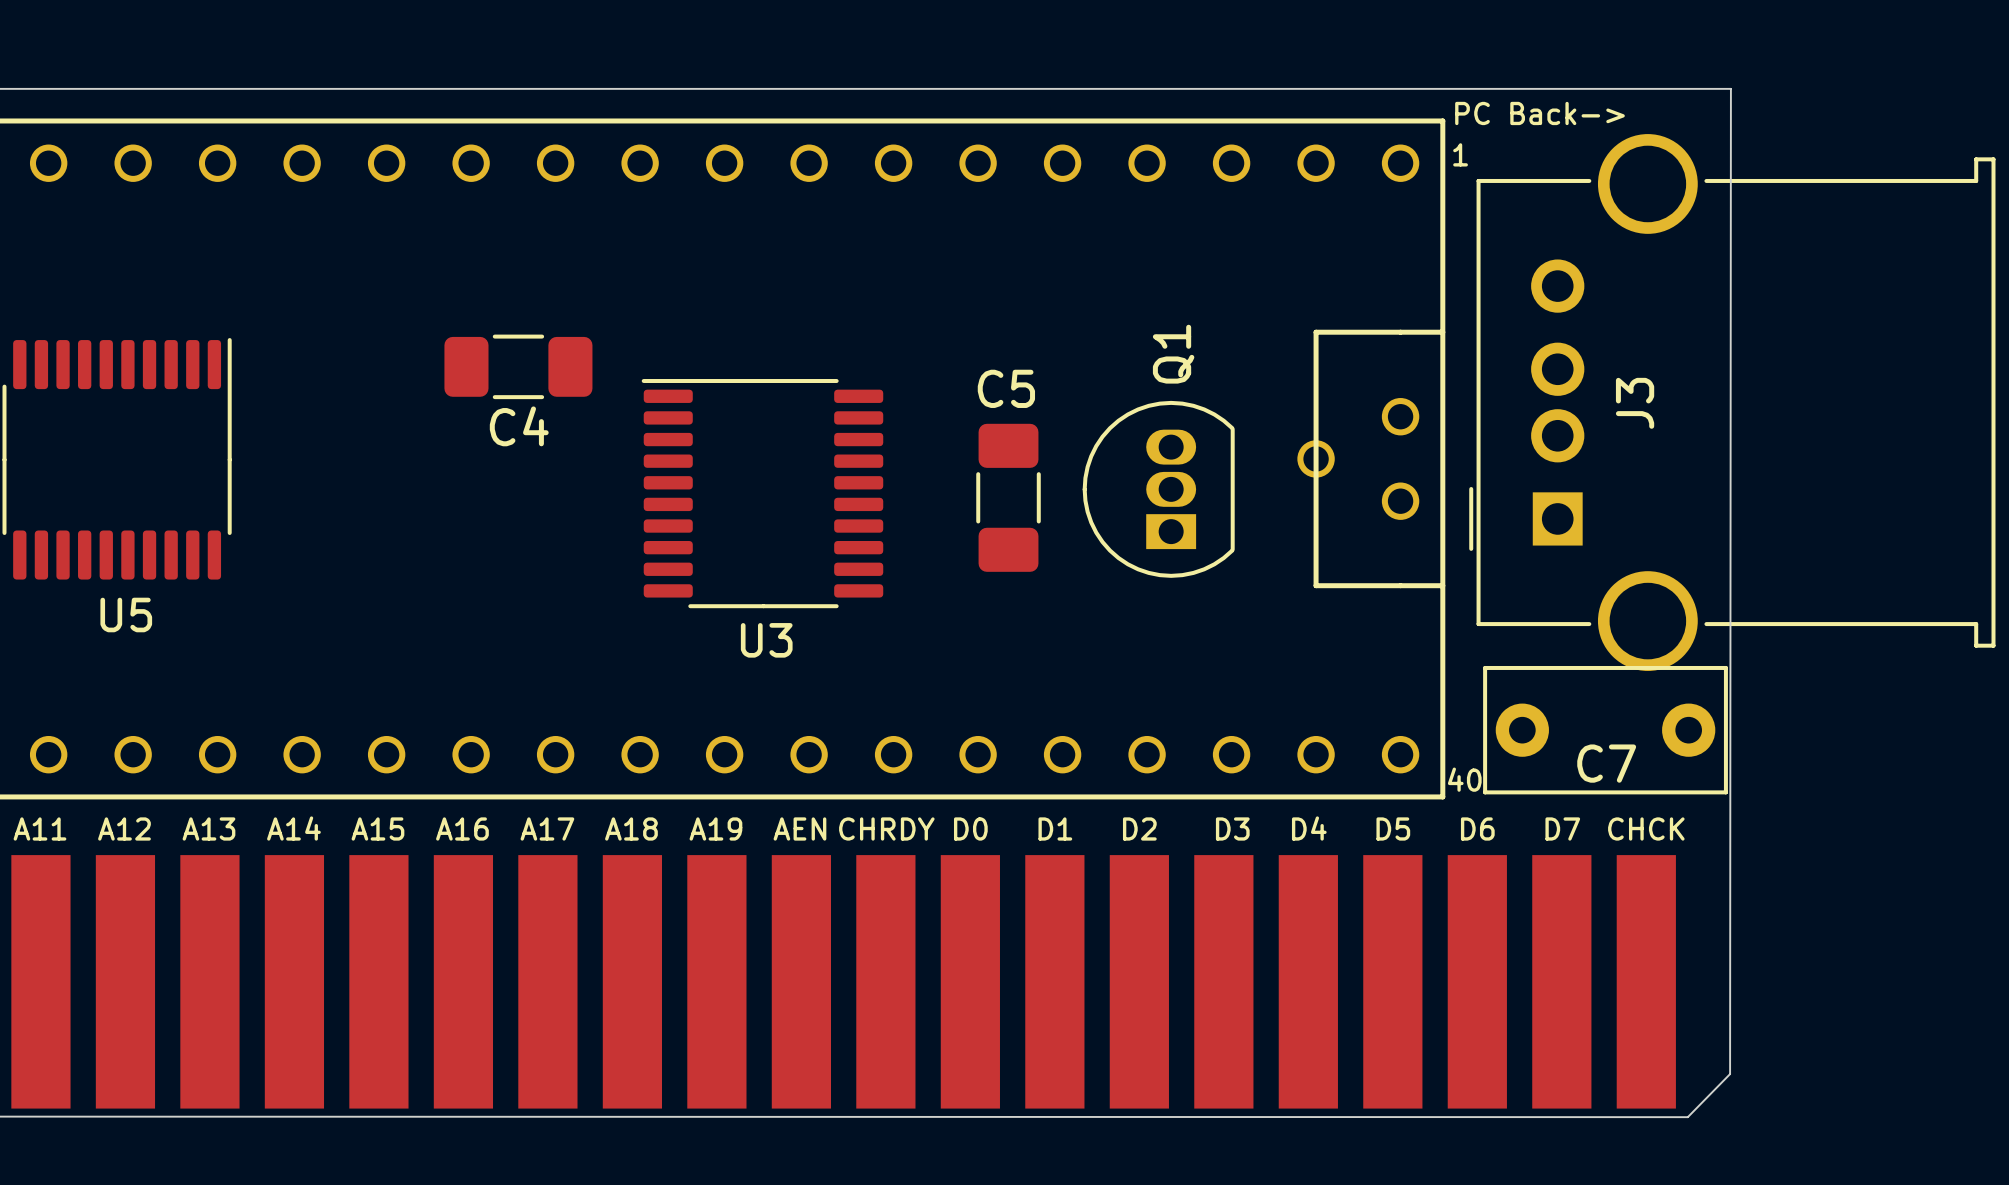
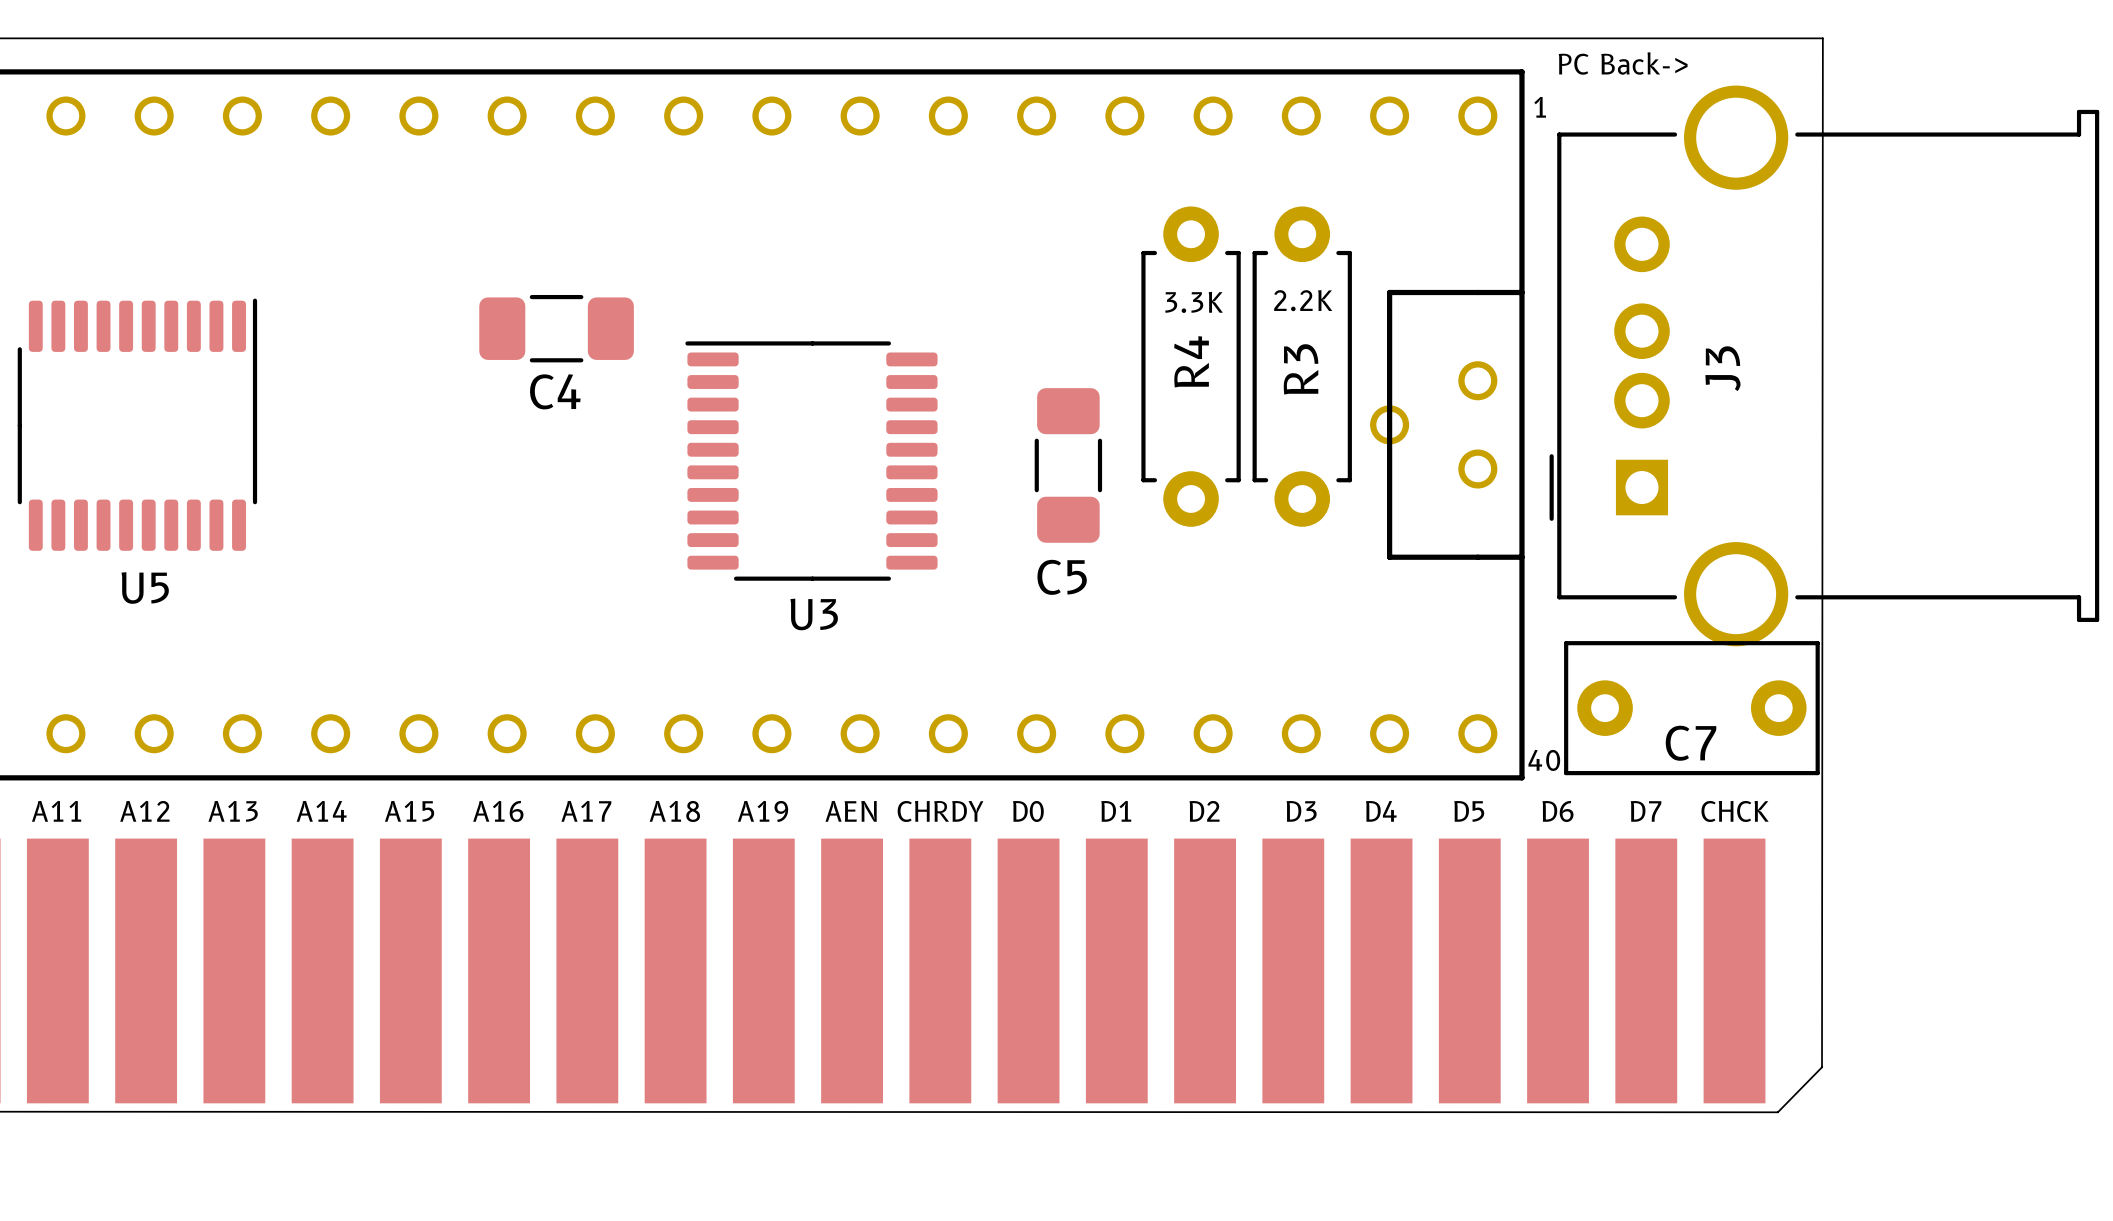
text: none -> 2.2K (1303, 300)
text: none -> 3.3K (1194, 302)
C5 name position: C5 (1006, 388) -> C5 (1062, 577)
R4: none -> (1191, 366)
R3: none -> (1302, 366)
Q1: (1158, 489) -> none

